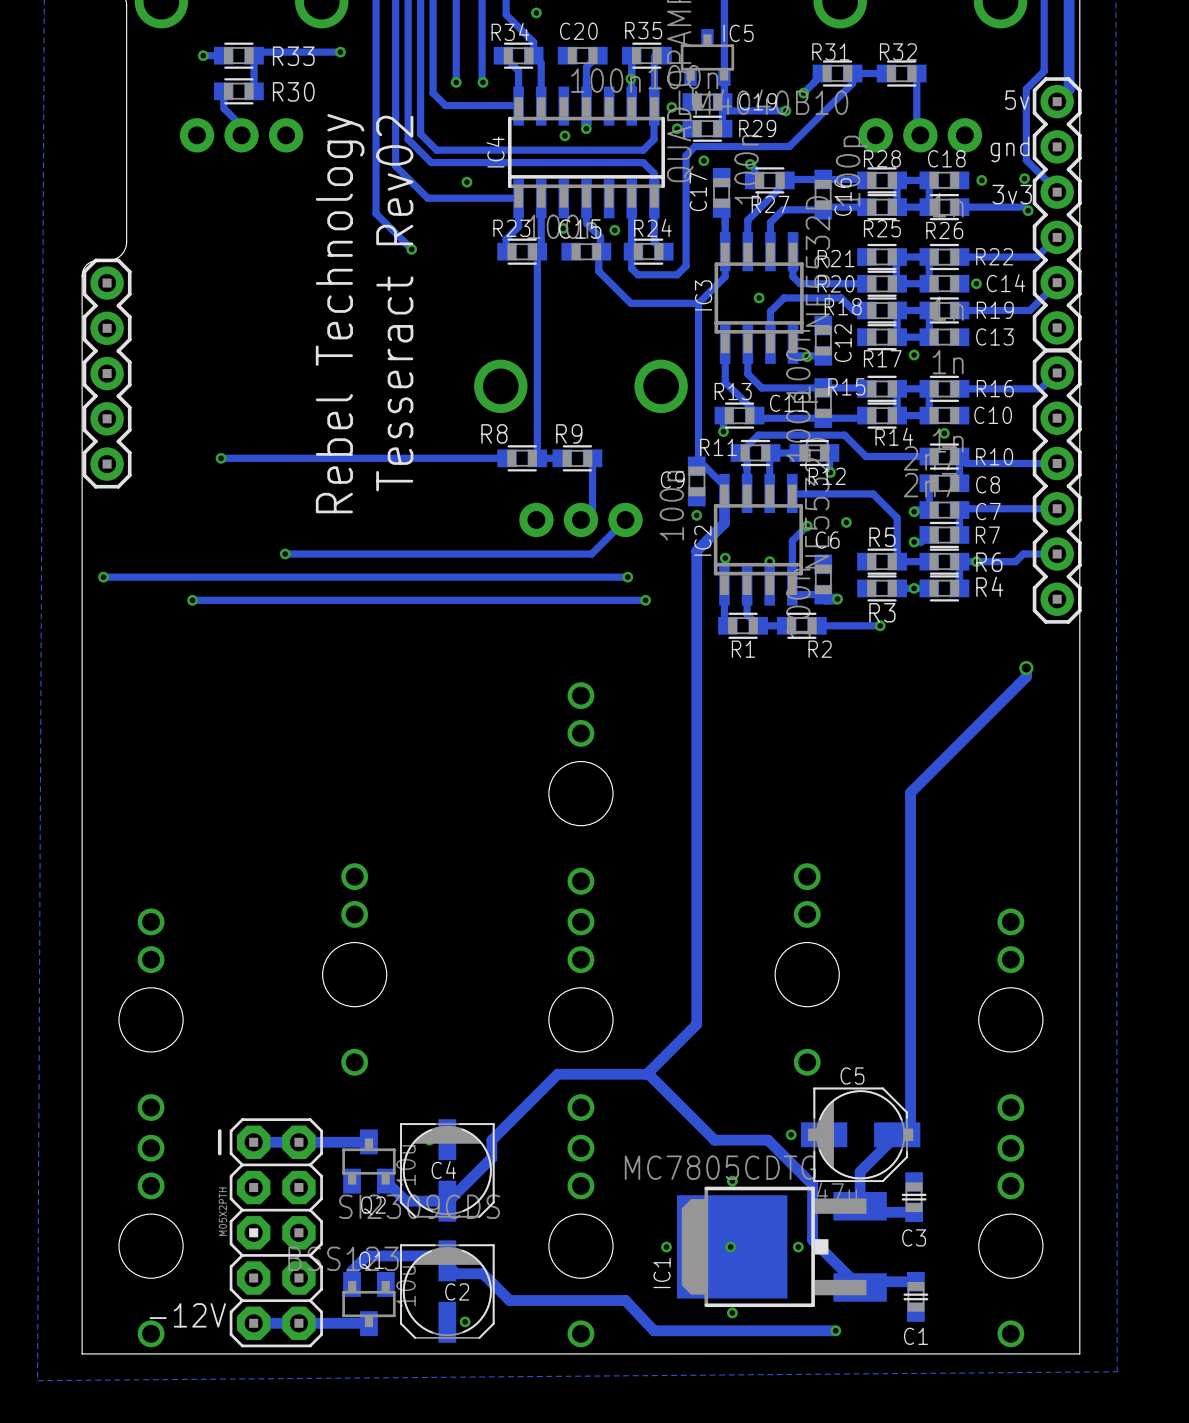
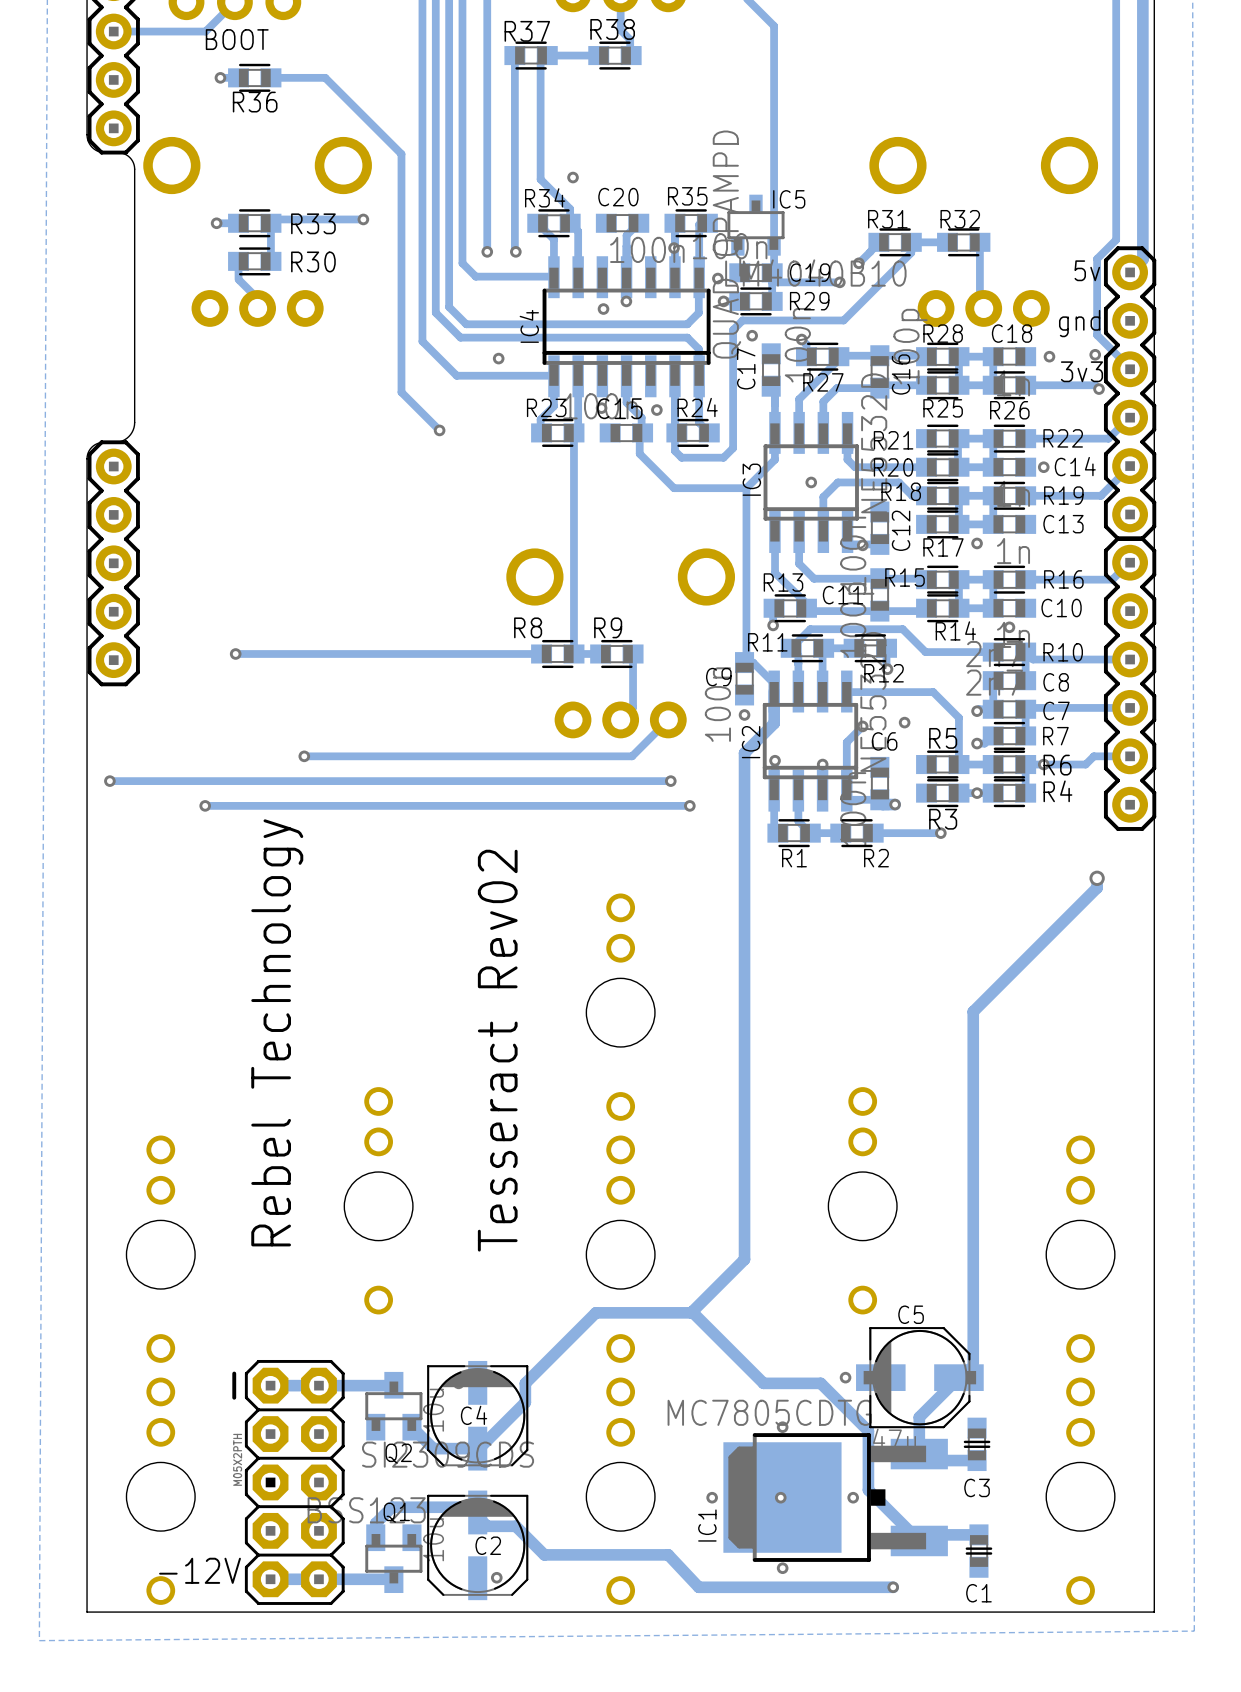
text: Tesseract Rev02 (394, 303) -> none
text: Rebel Technology (340, 313) -> none
text: none -> Rebel Technology (277, 1032)
text: none -> Tesseract Rev02 (497, 1050)

